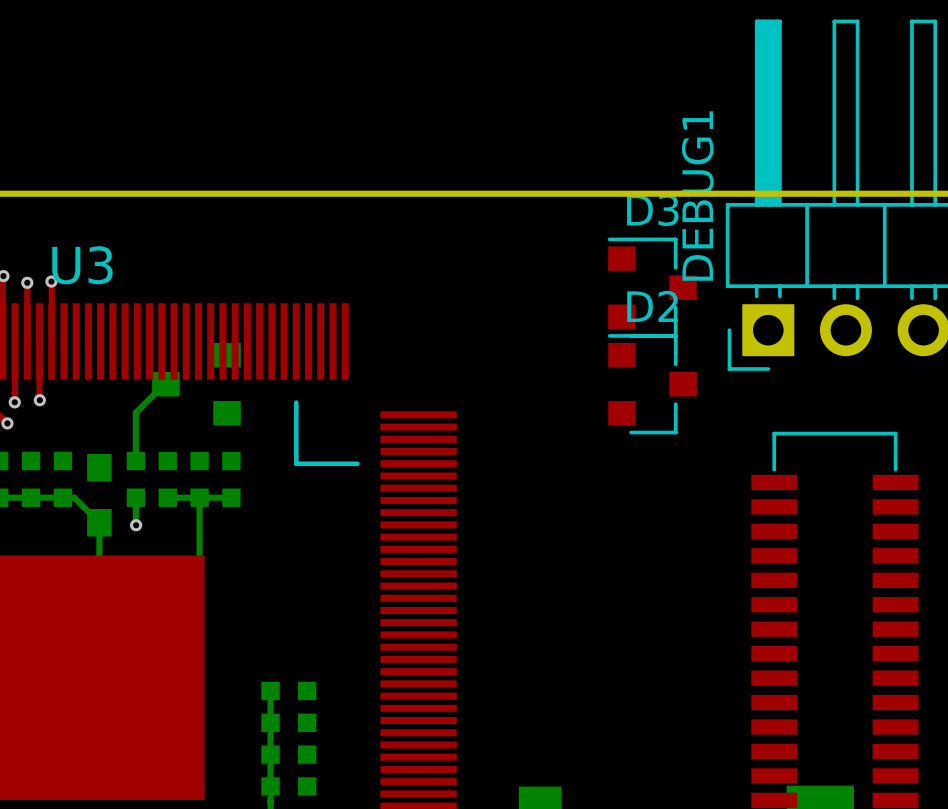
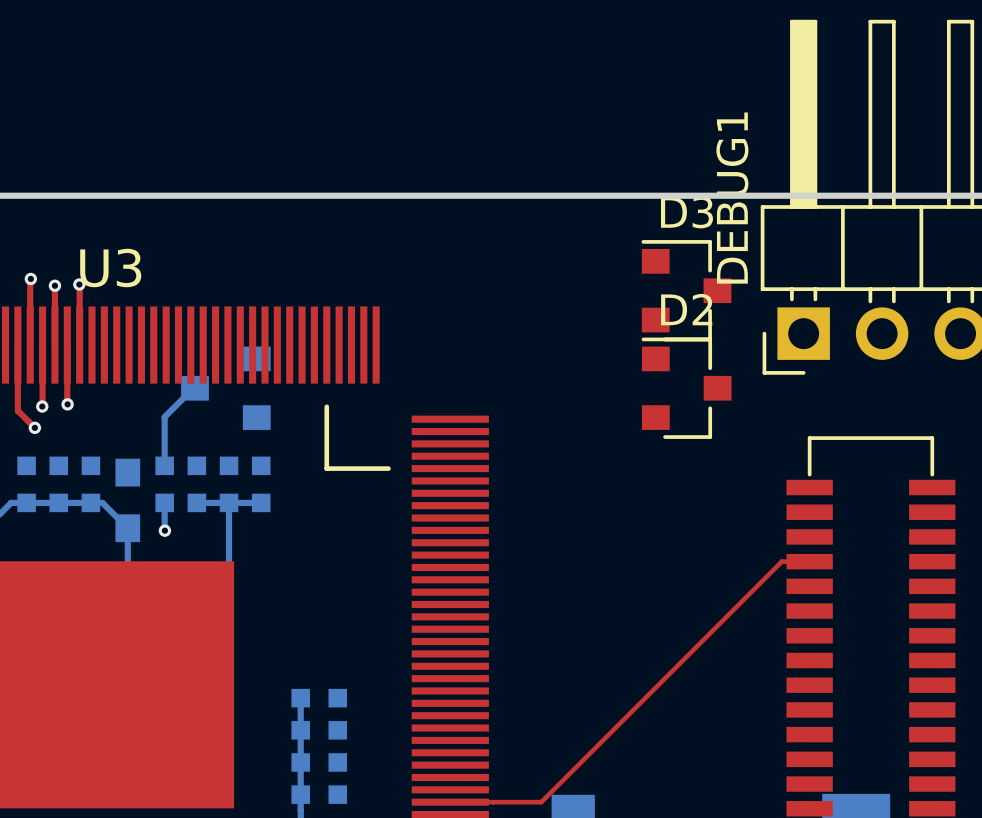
top track: none -> (809, 561) (781, 561) (541, 802) (450, 802)

